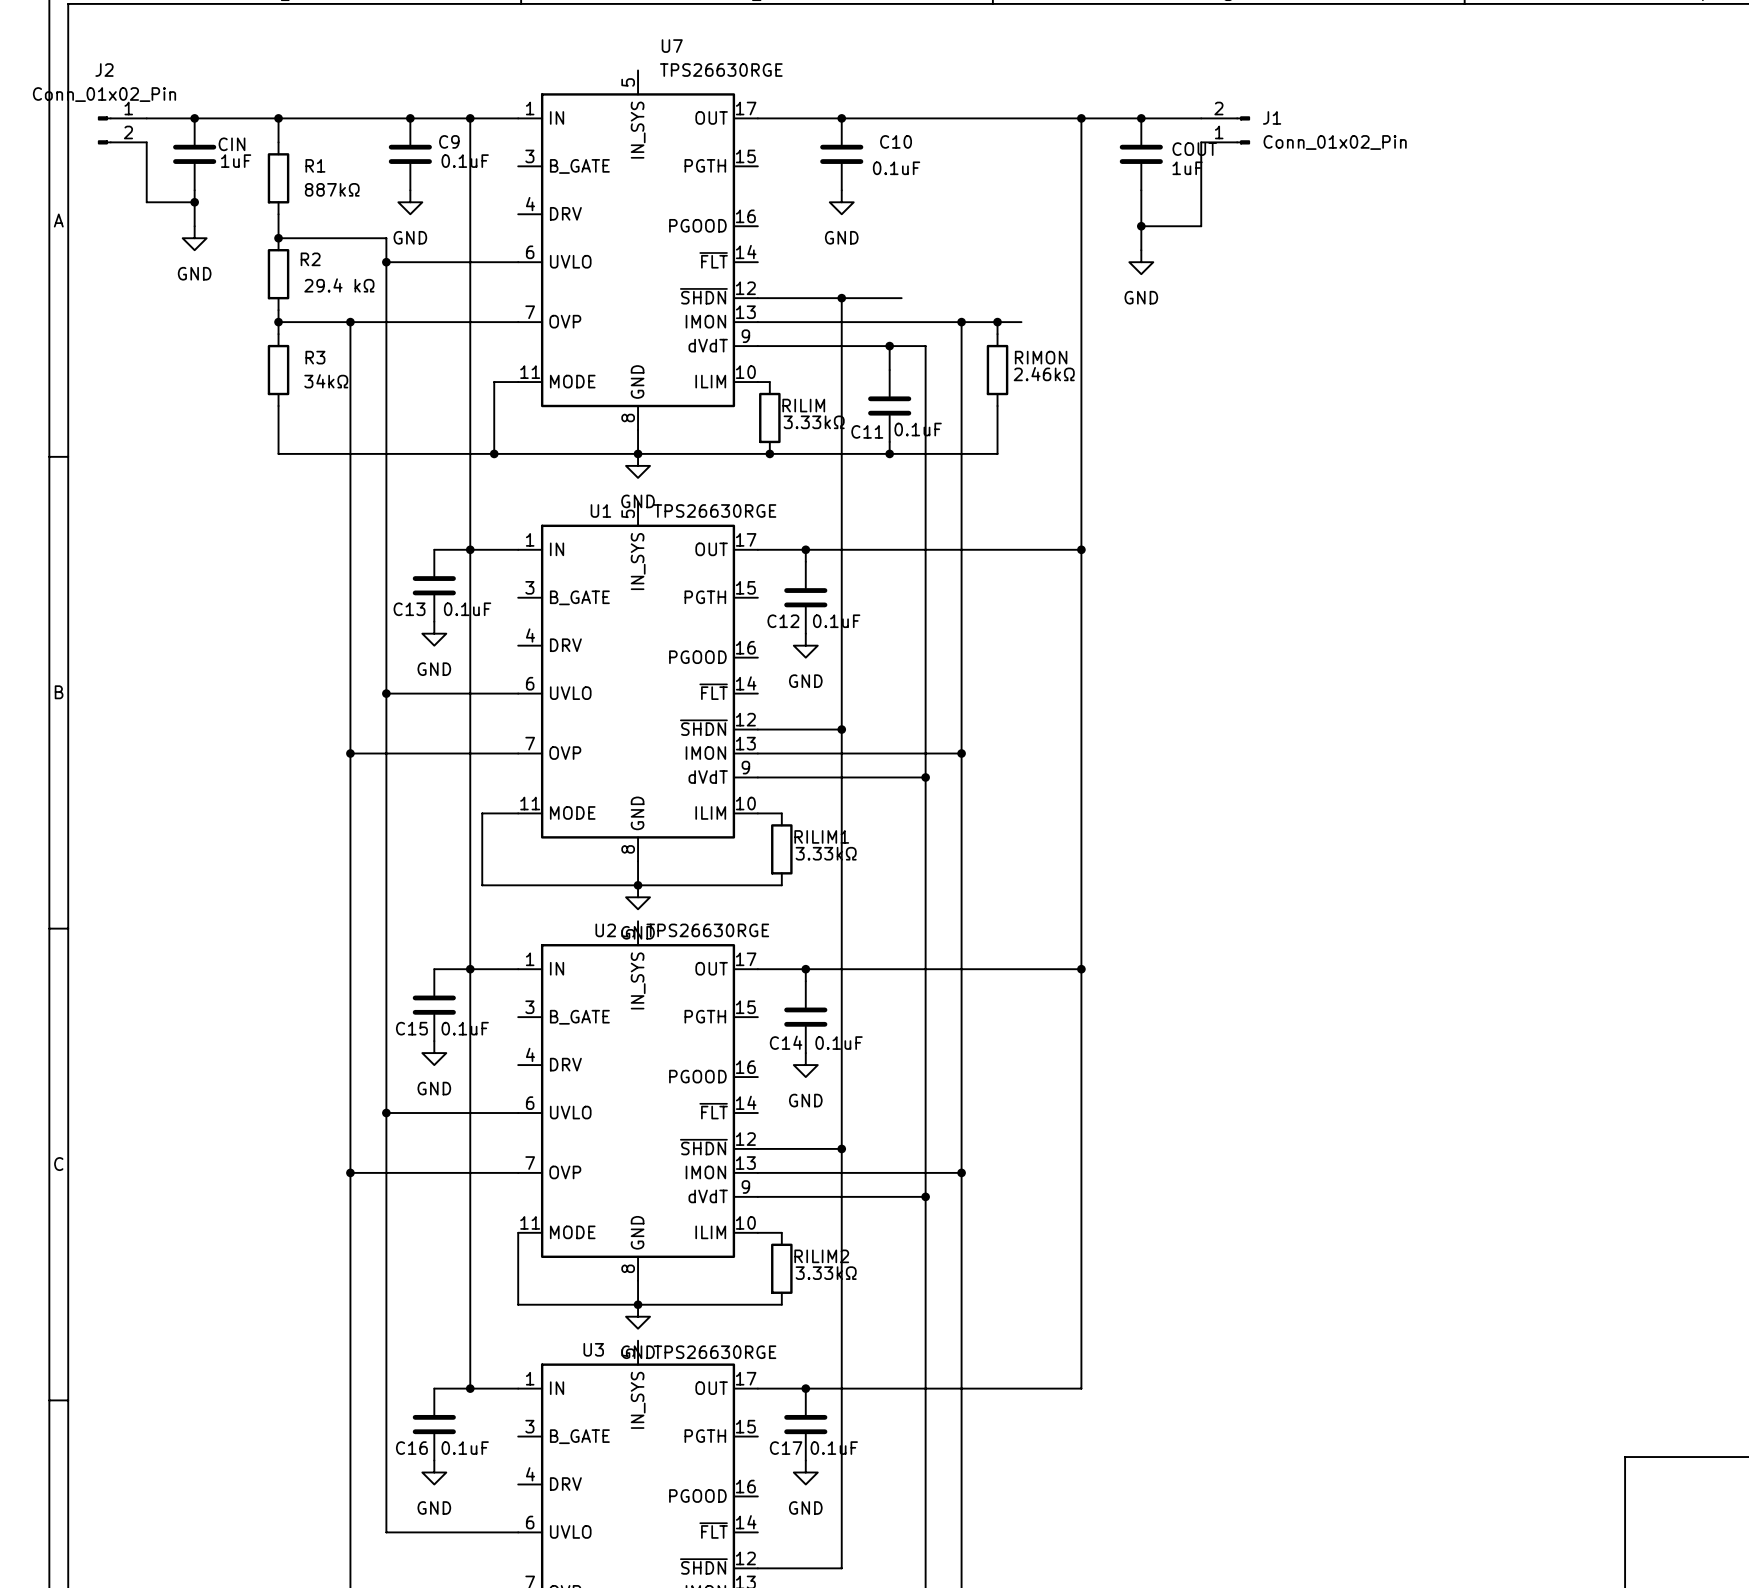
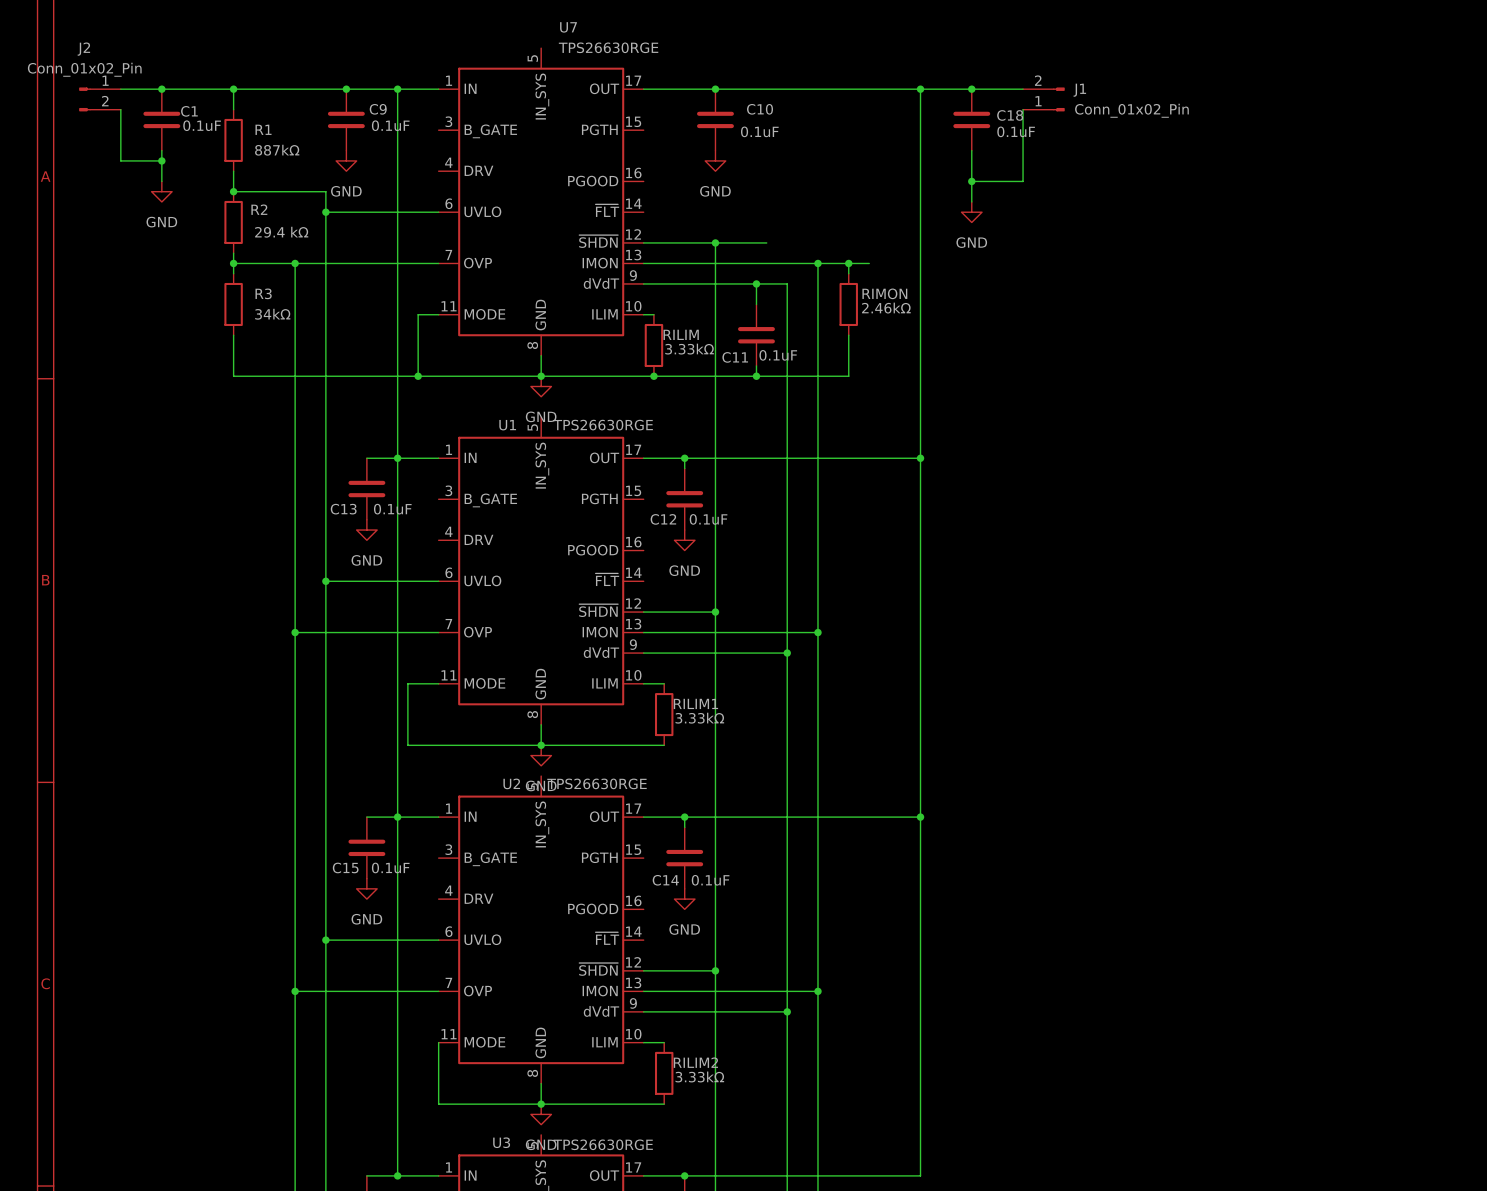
CIN name: CIN (232, 144) -> C1 (189, 111)
COUT name: COUT (1194, 149) -> C18 (1010, 115)
CIN value: 1uF (236, 161) -> 0.1uF (202, 125)
COUT value: 1uF (1187, 168) -> 0.1uF (1016, 131)

